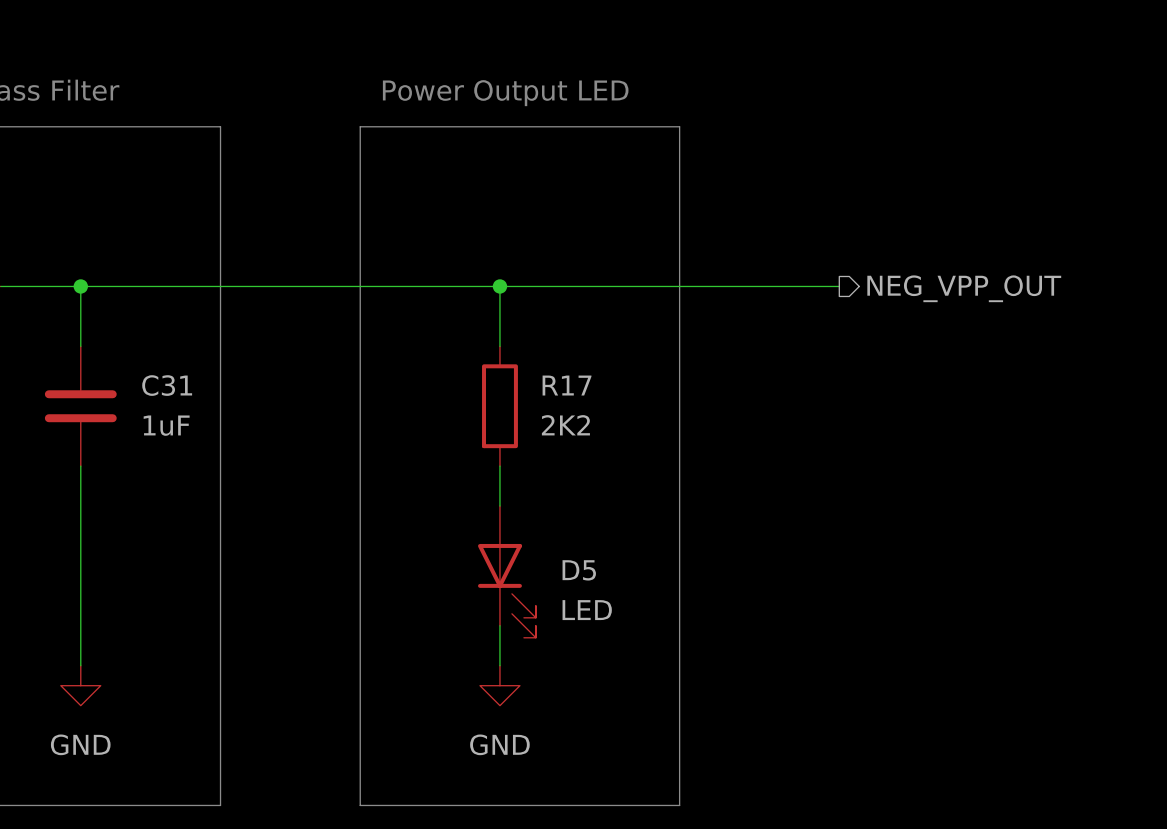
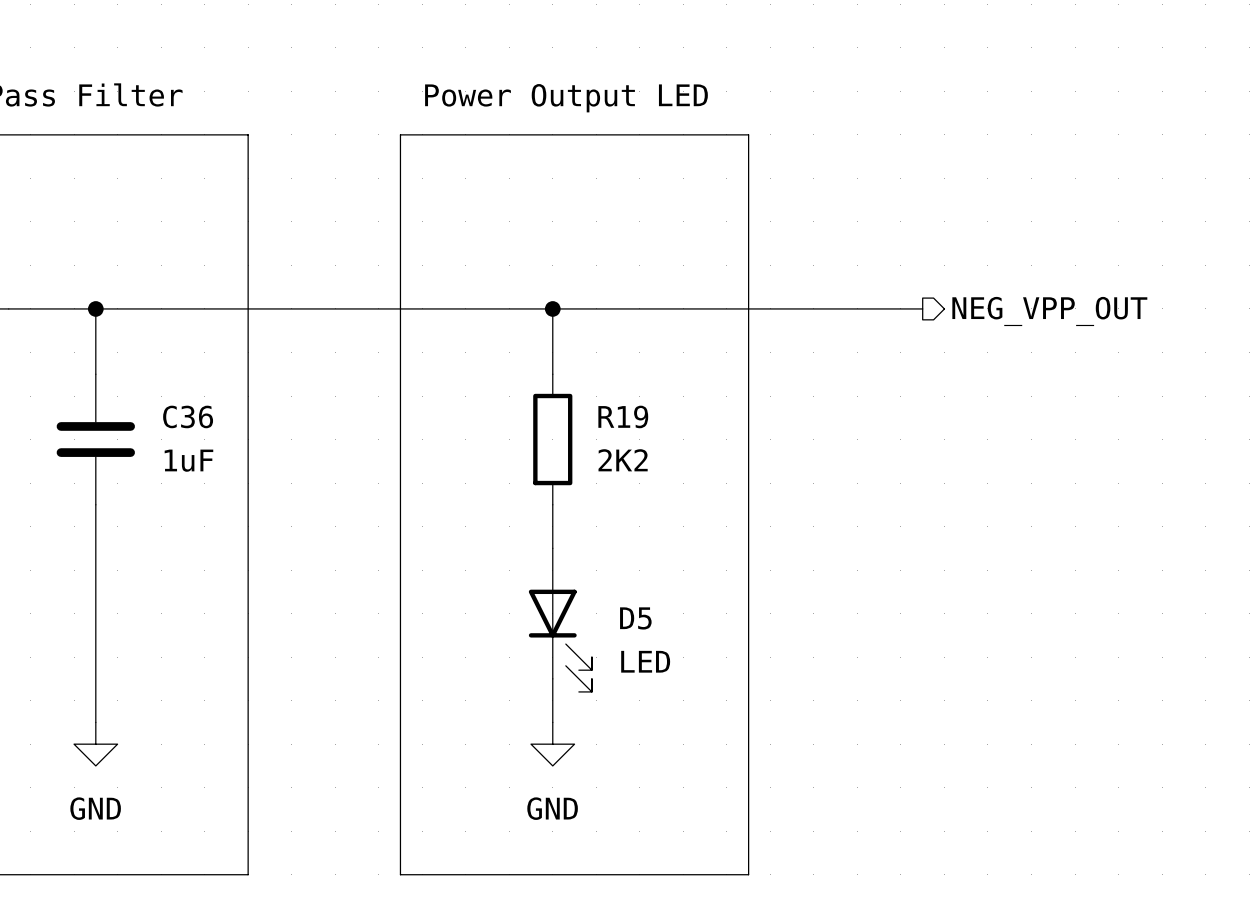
C31 name: C31 (167, 385) -> C36 (188, 416)
R17 name: R17 (567, 385) -> R19 (623, 416)

